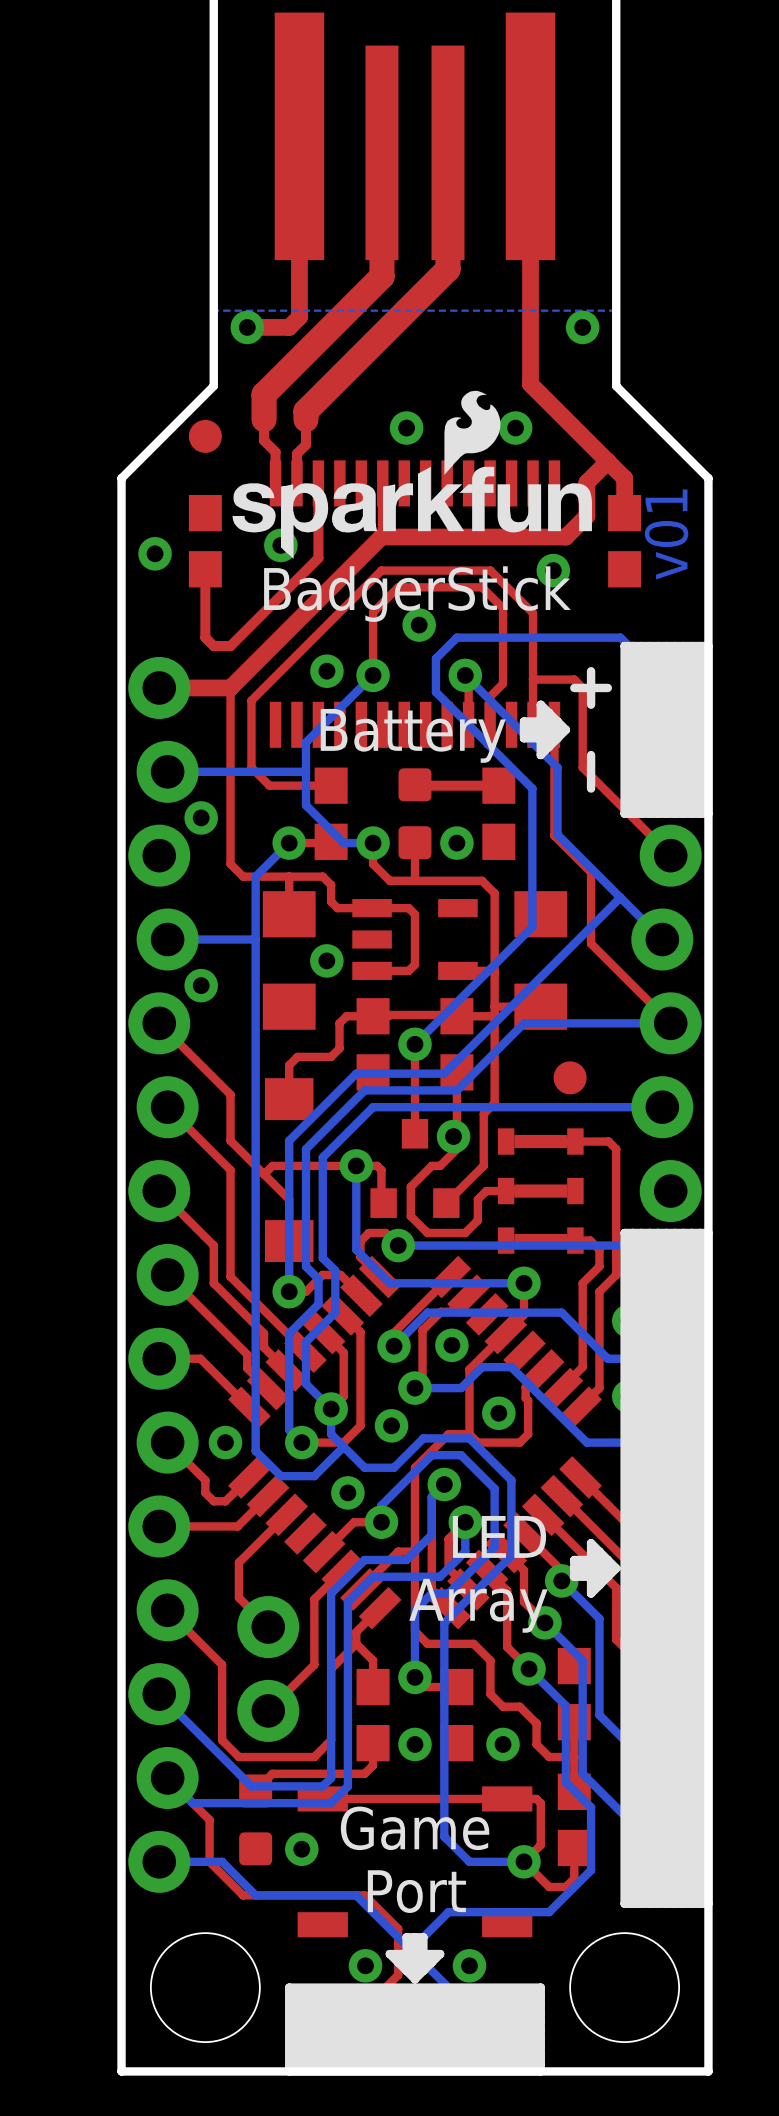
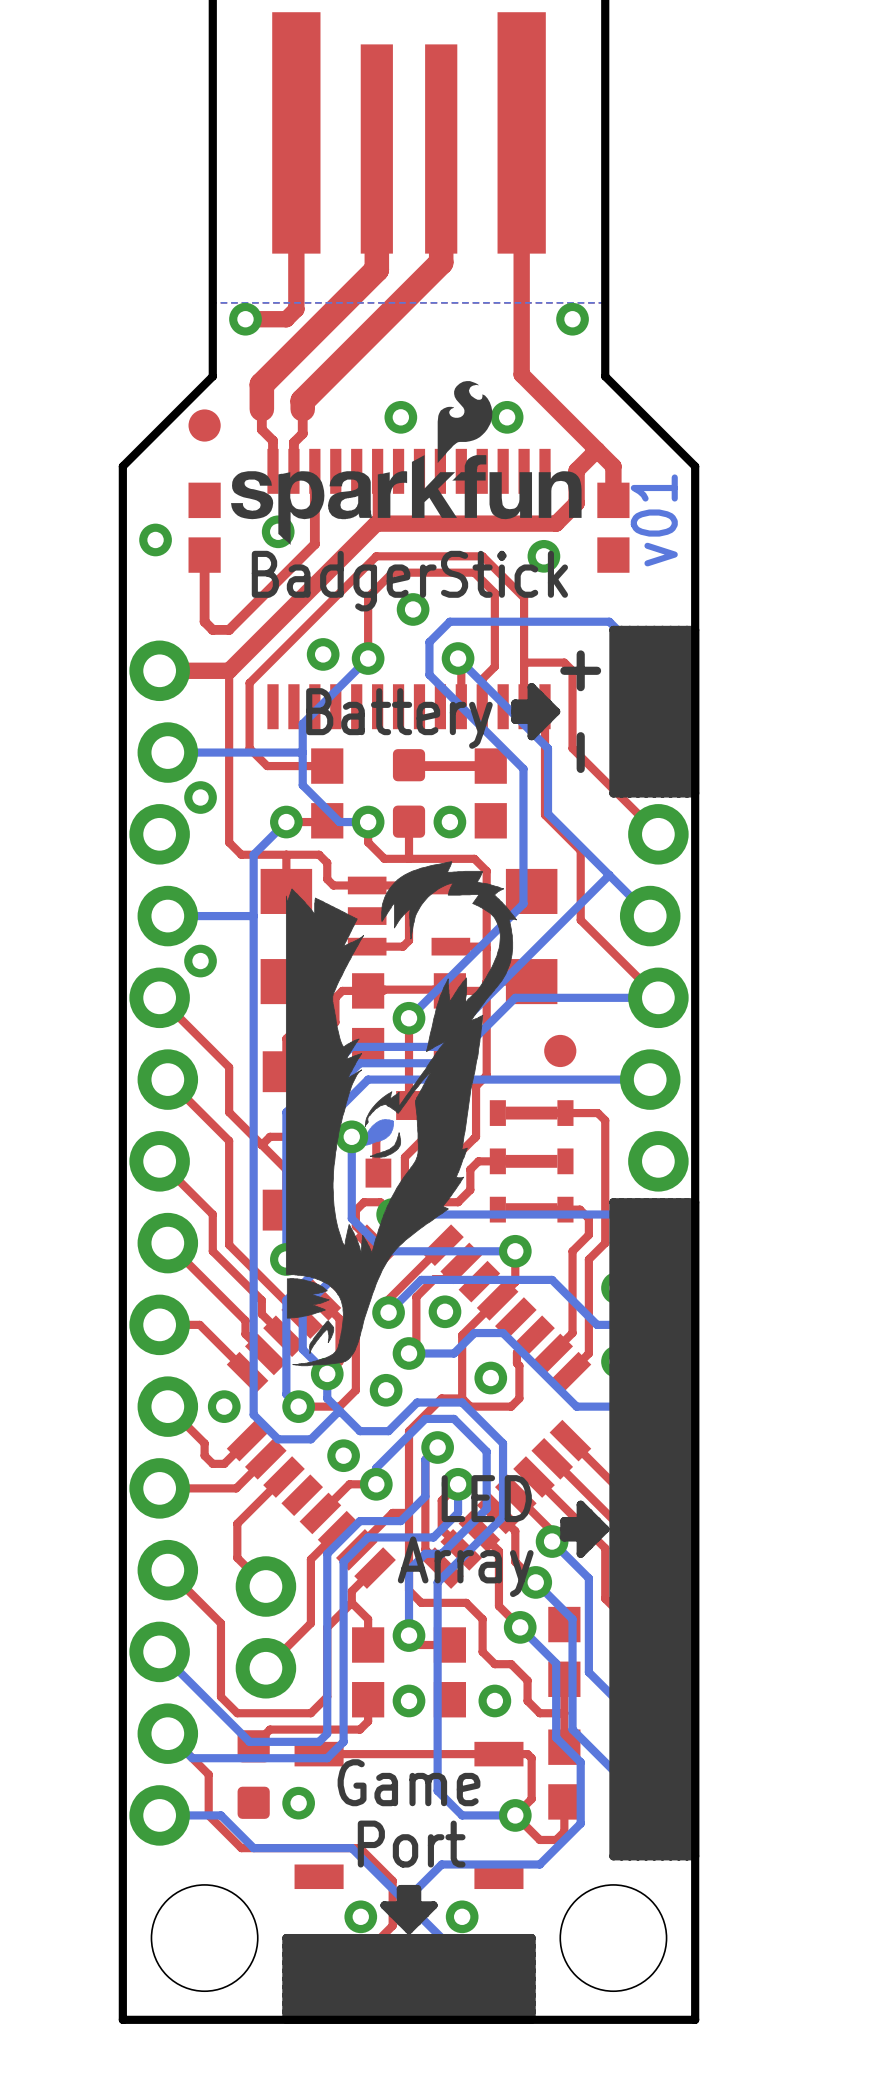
drawing: none -> [285, 861, 517, 1367]

